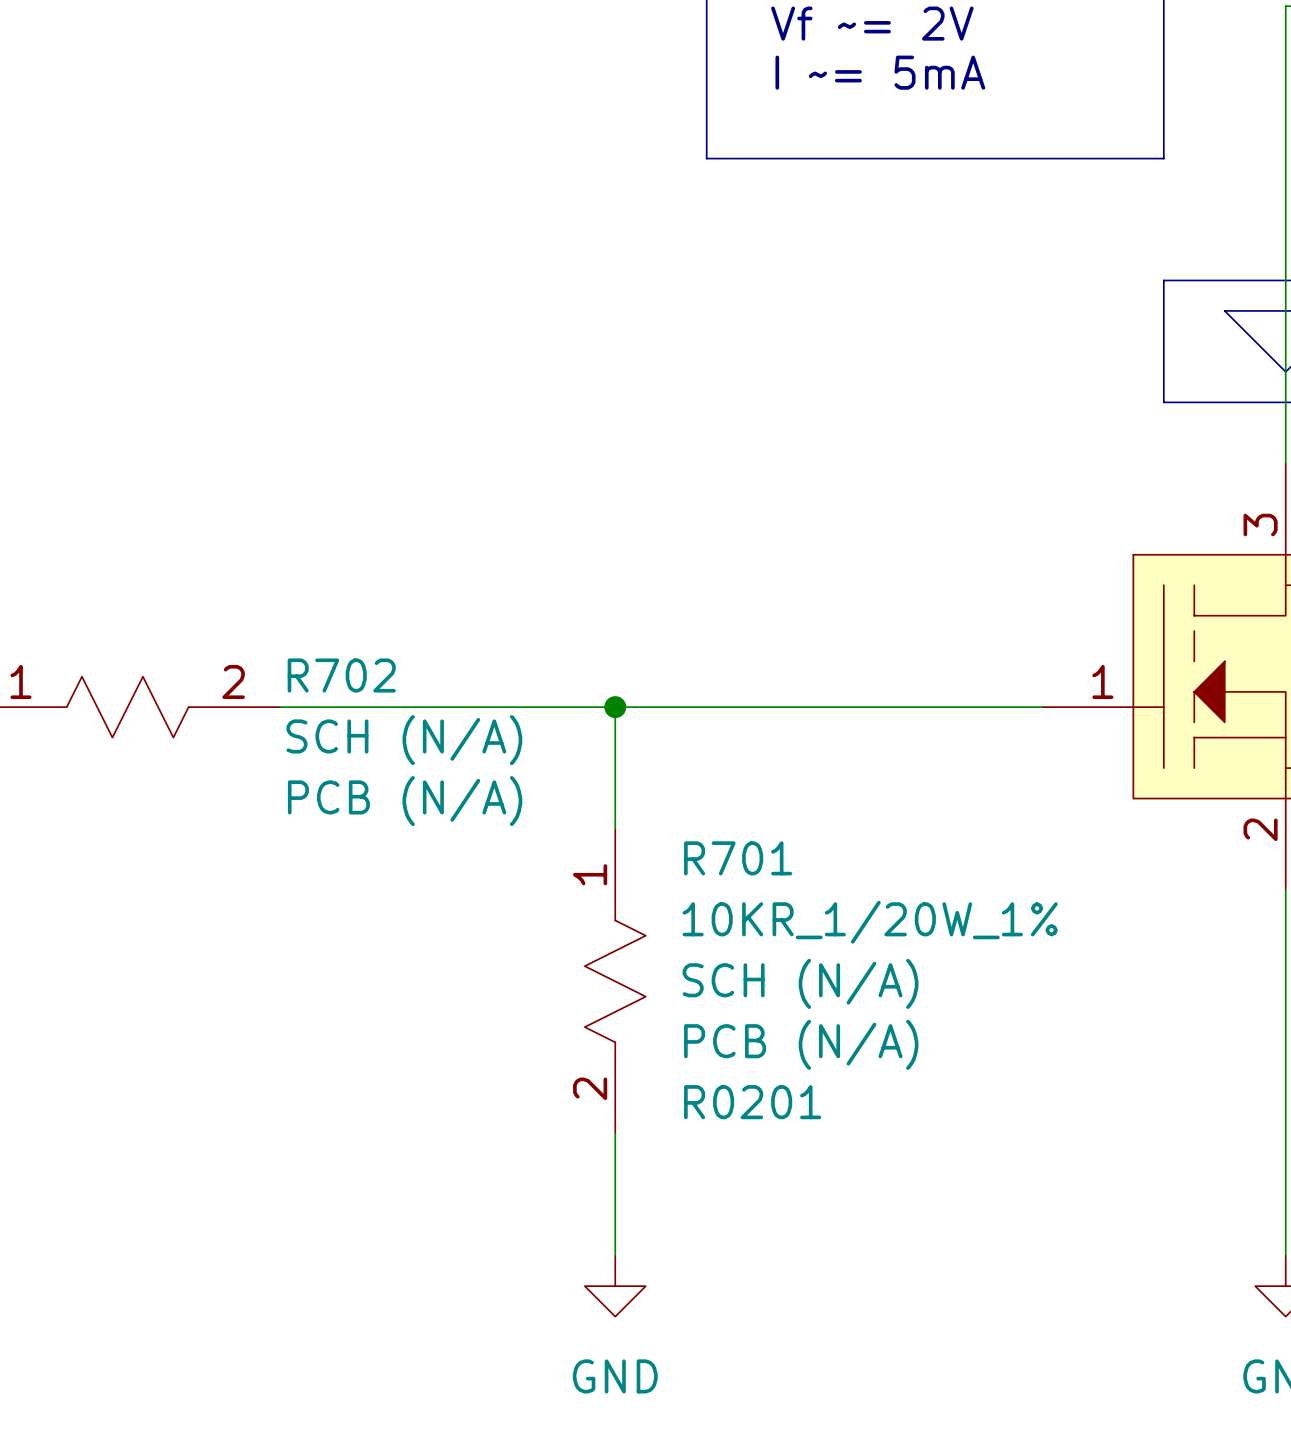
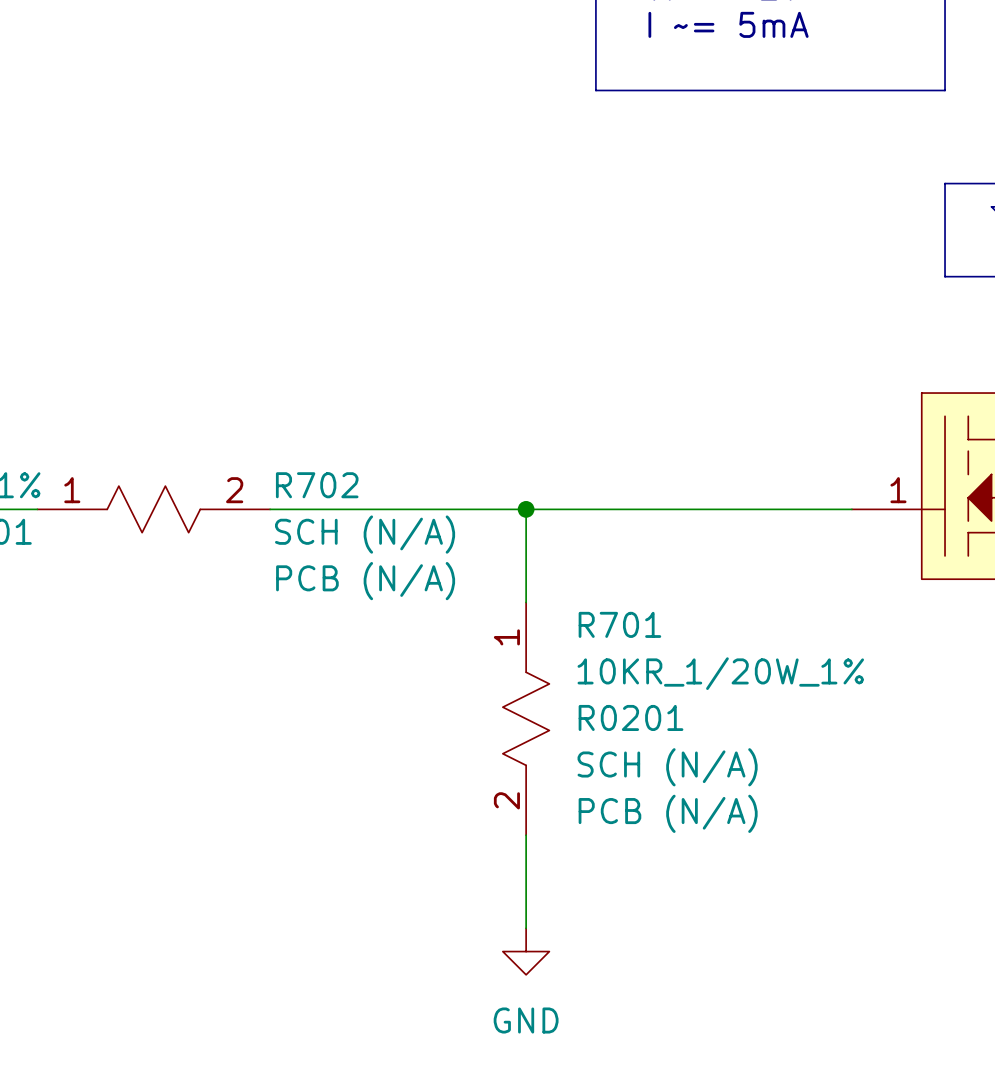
R701 text position: SCH (N/A) (800, 983) -> SCH (N/A) (667, 767)
R701 text position: PCB (N/A) (801, 1044) -> PCB (N/A) (668, 813)
R701 text position: R0201 (752, 1102) -> R0201 (631, 717)

